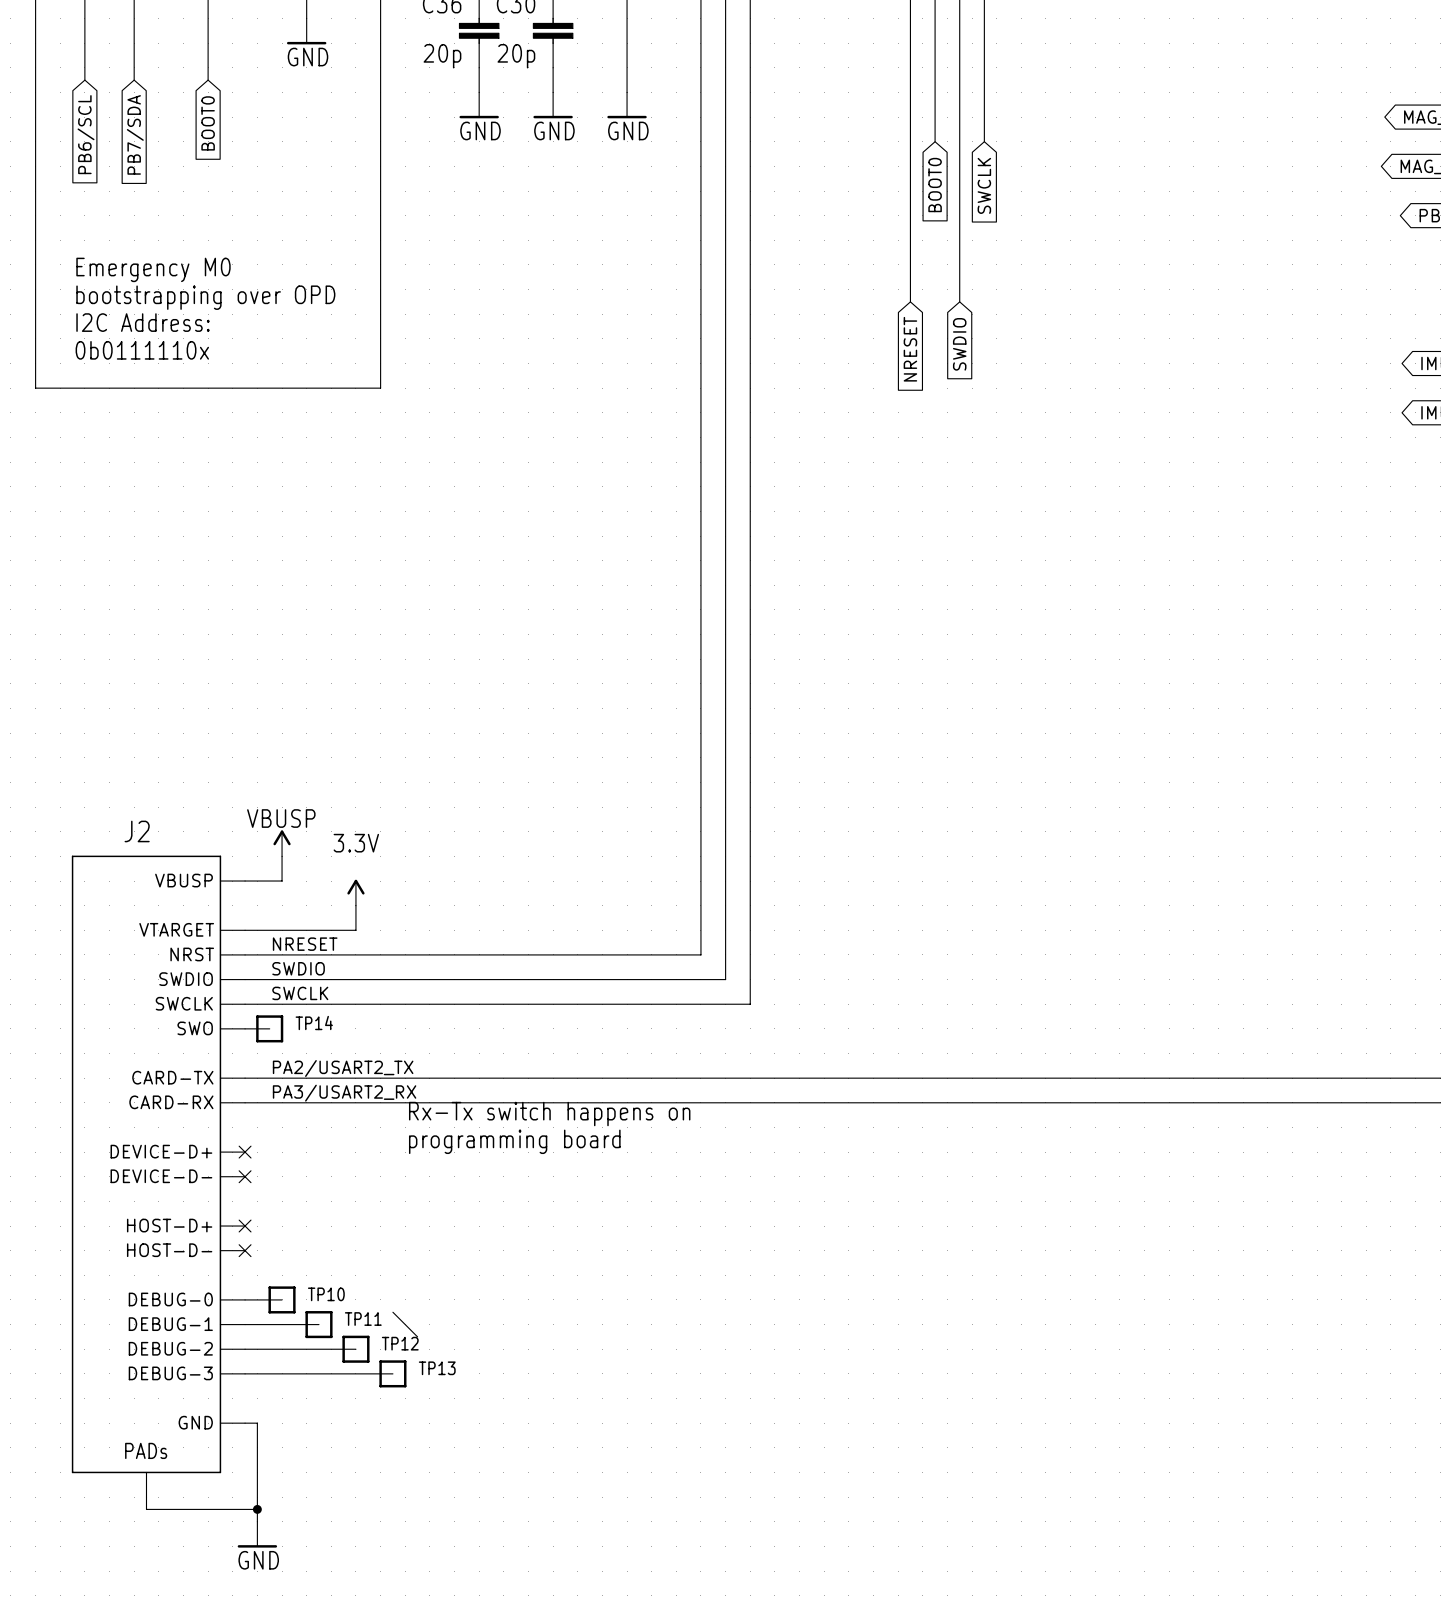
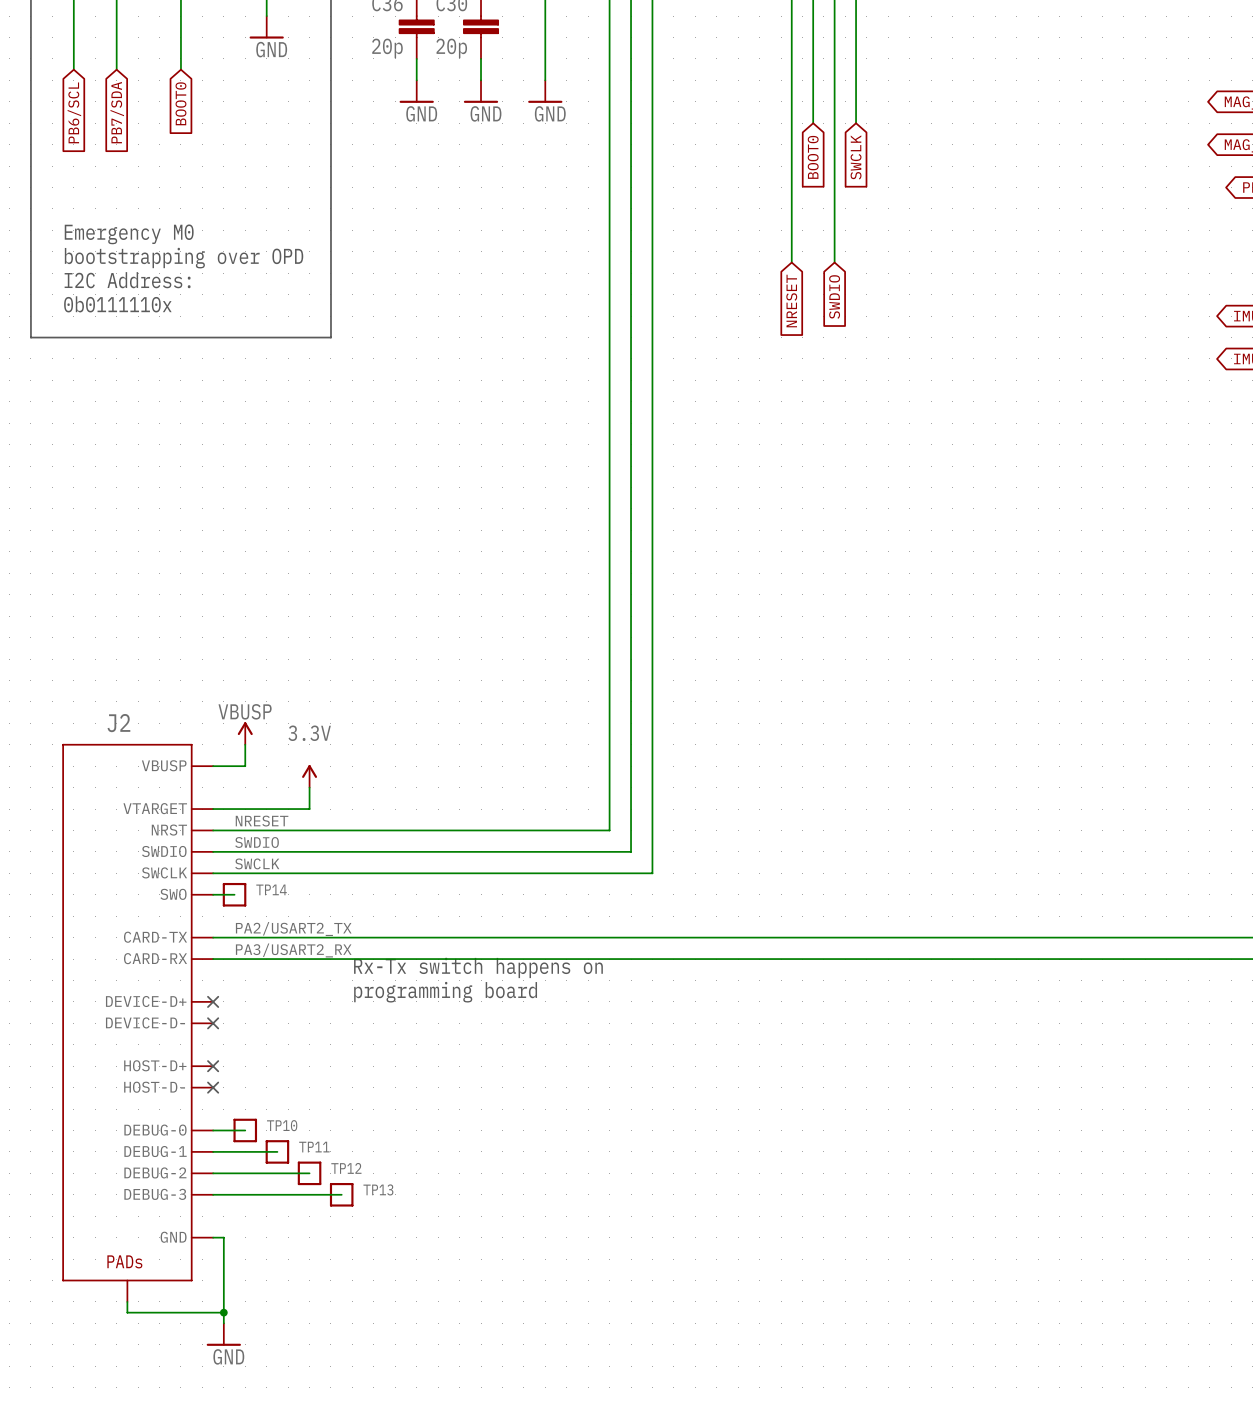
wire: (392, 1312) (417, 1336) -> none

